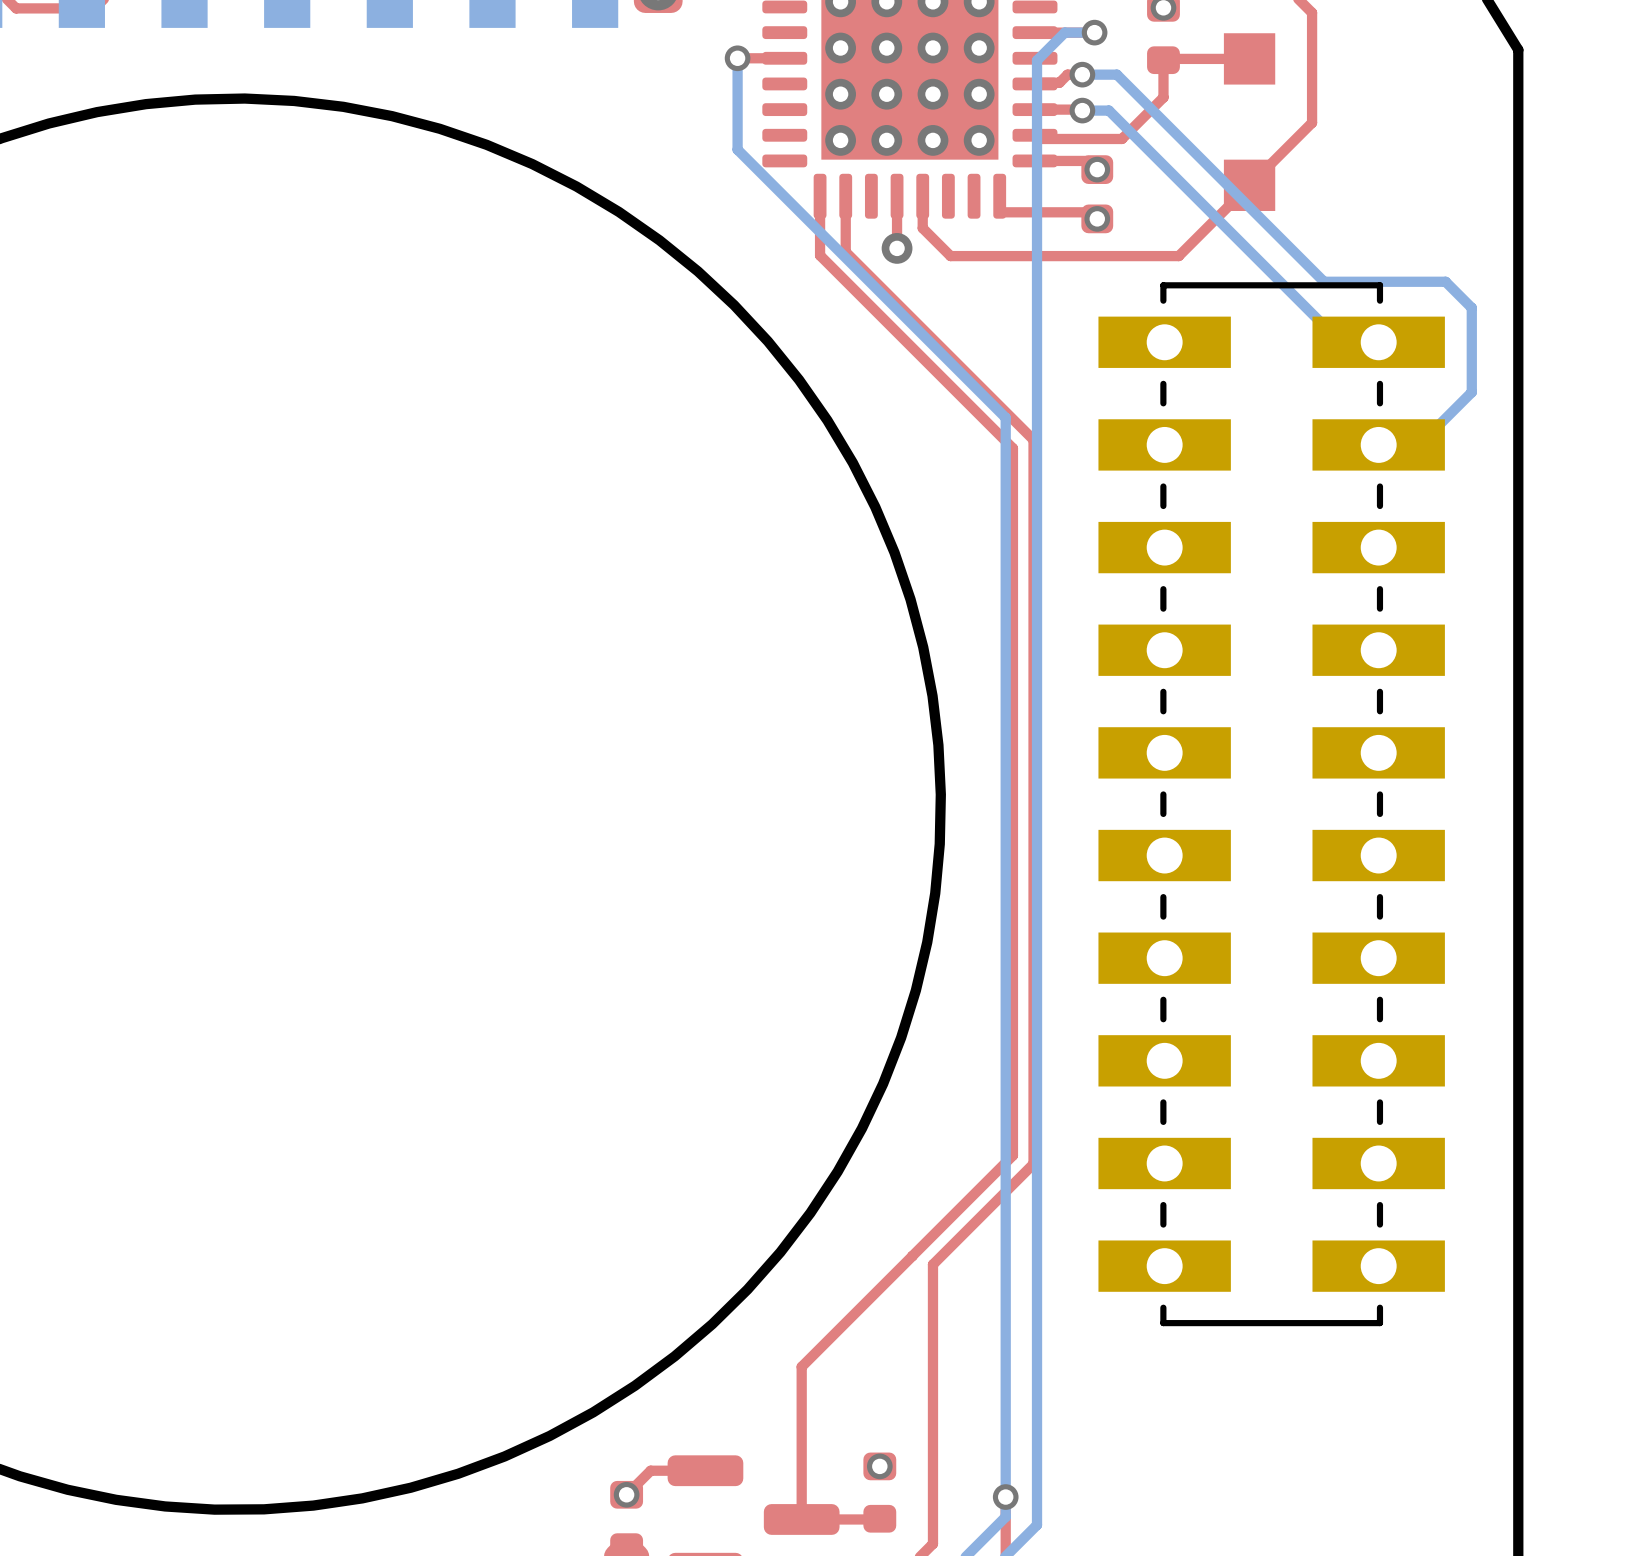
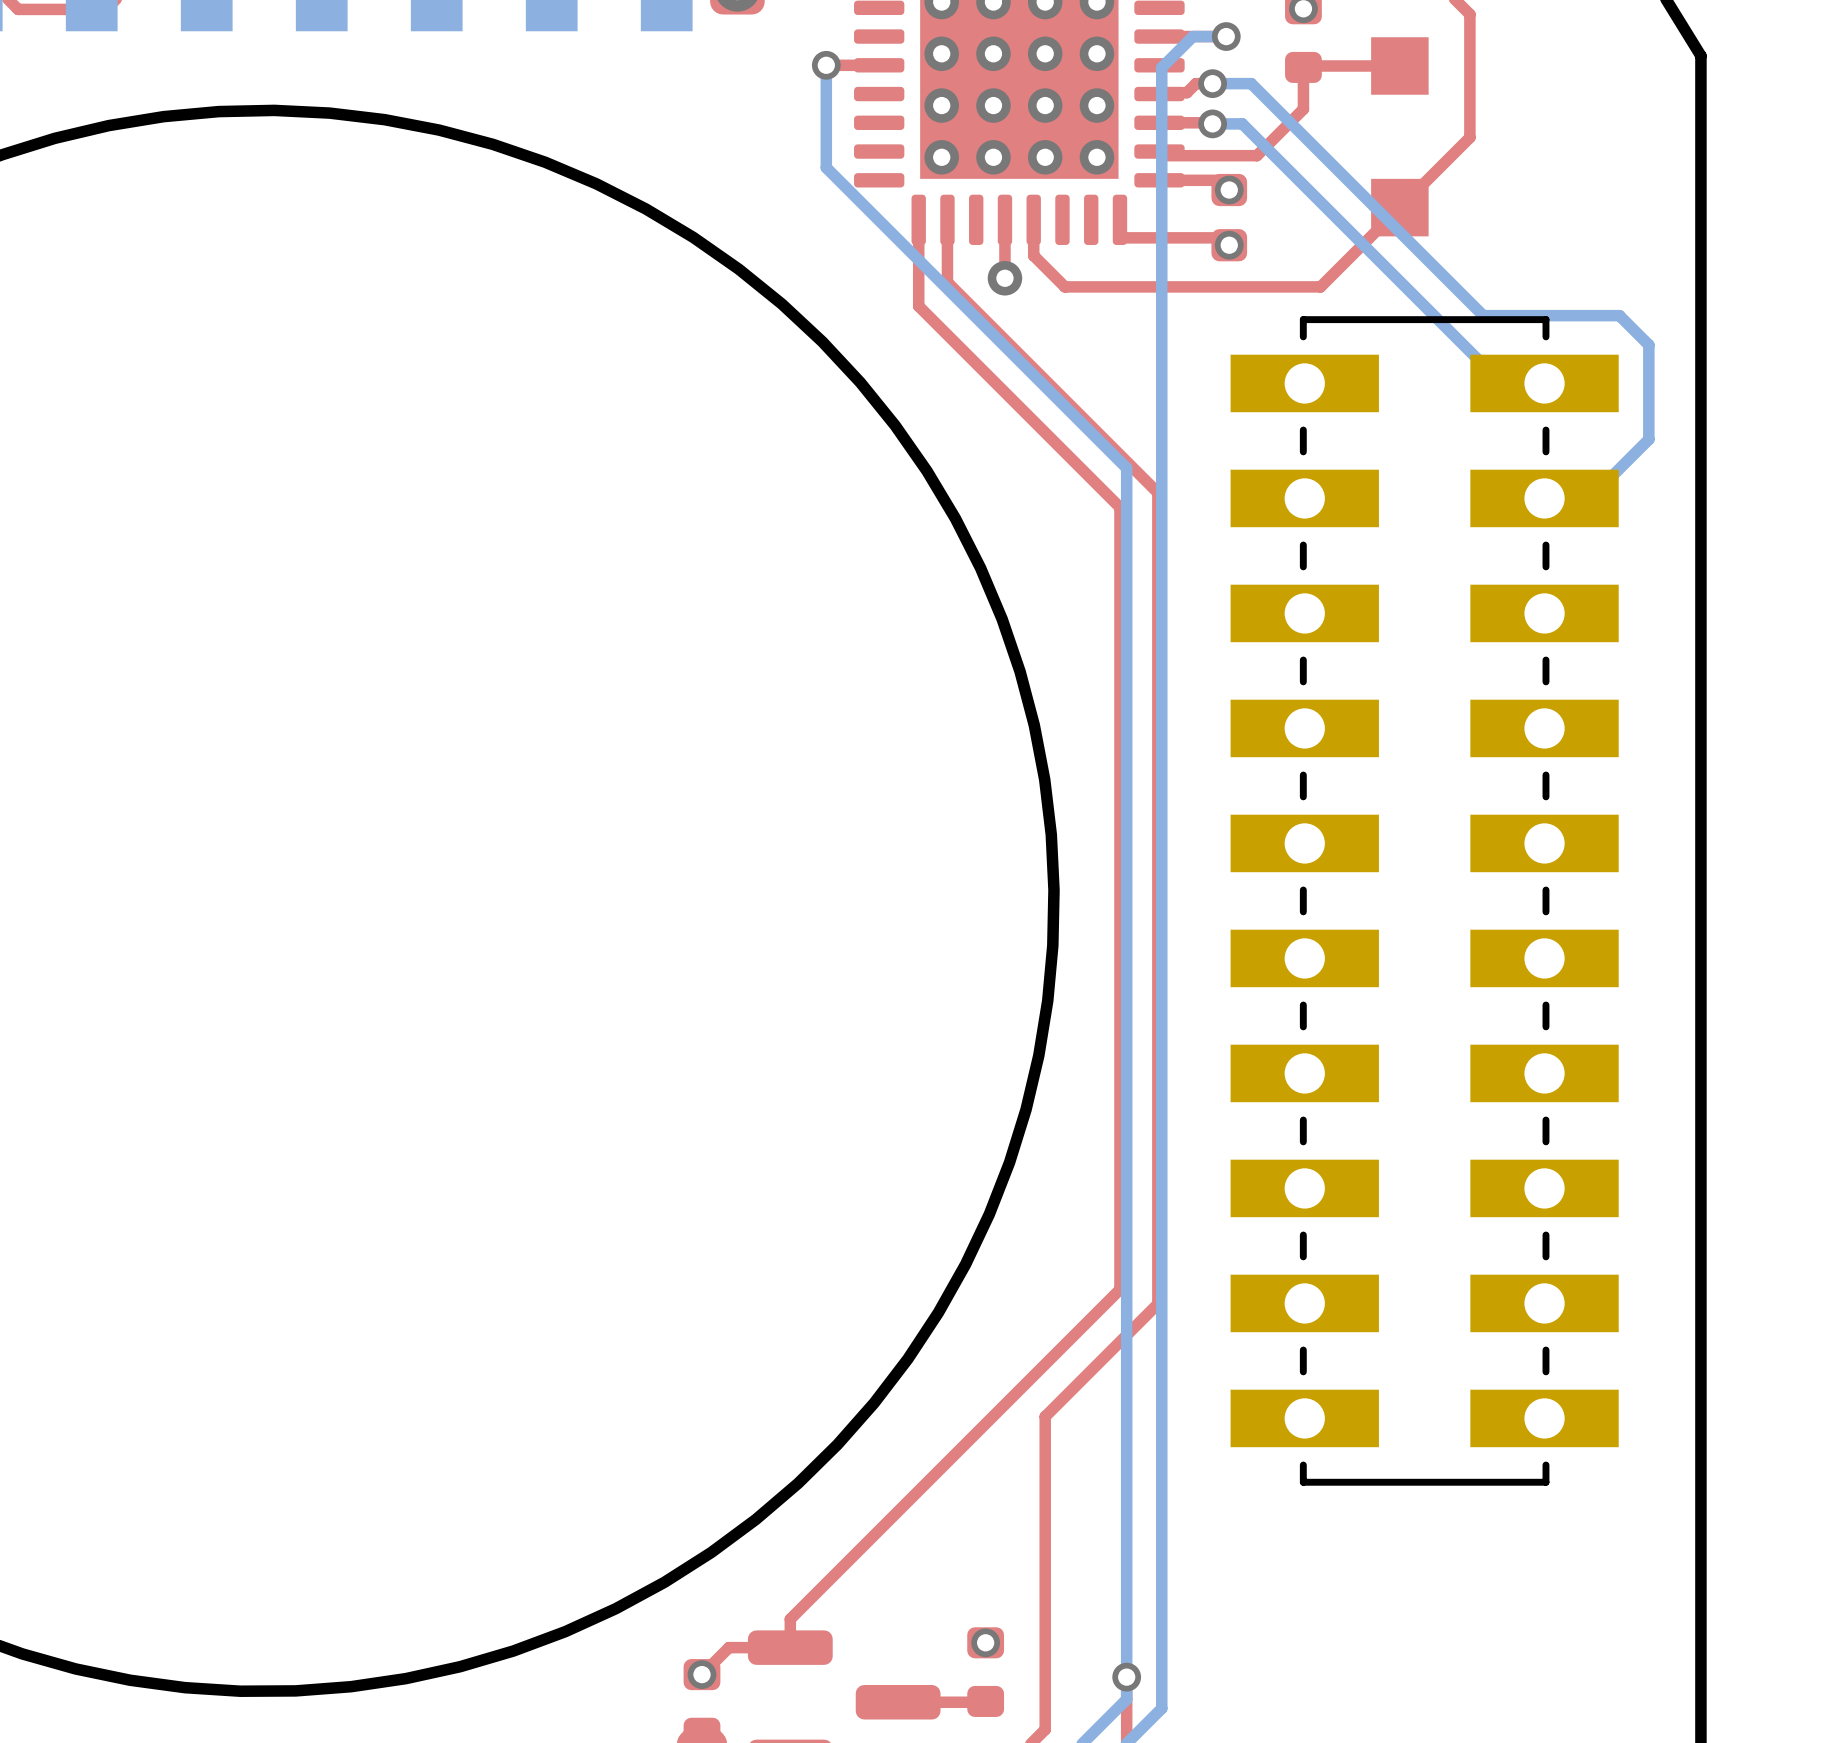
top track: (820, 255) (1012, 448) (1012, 1155) (801, 1366) (801, 1519) -> (918, 286) (918, 306) (1119, 507) (1119, 1289) (790, 1619) (790, 1647)

